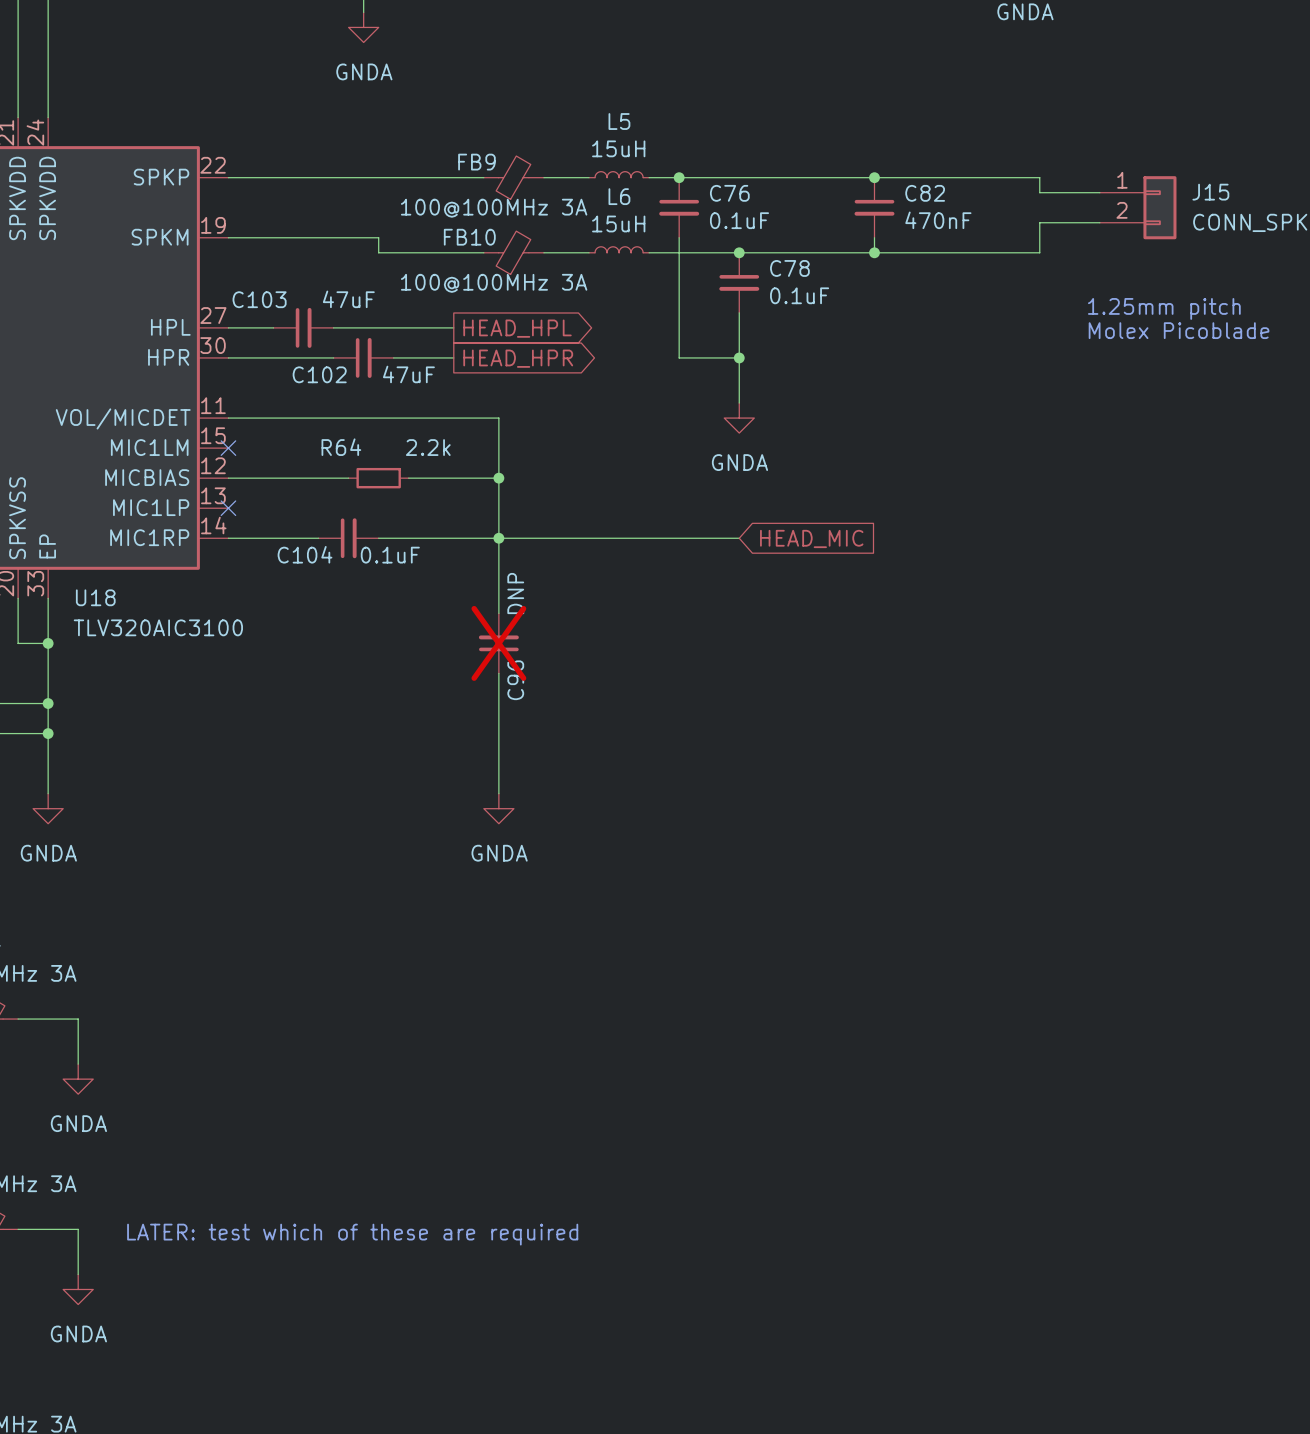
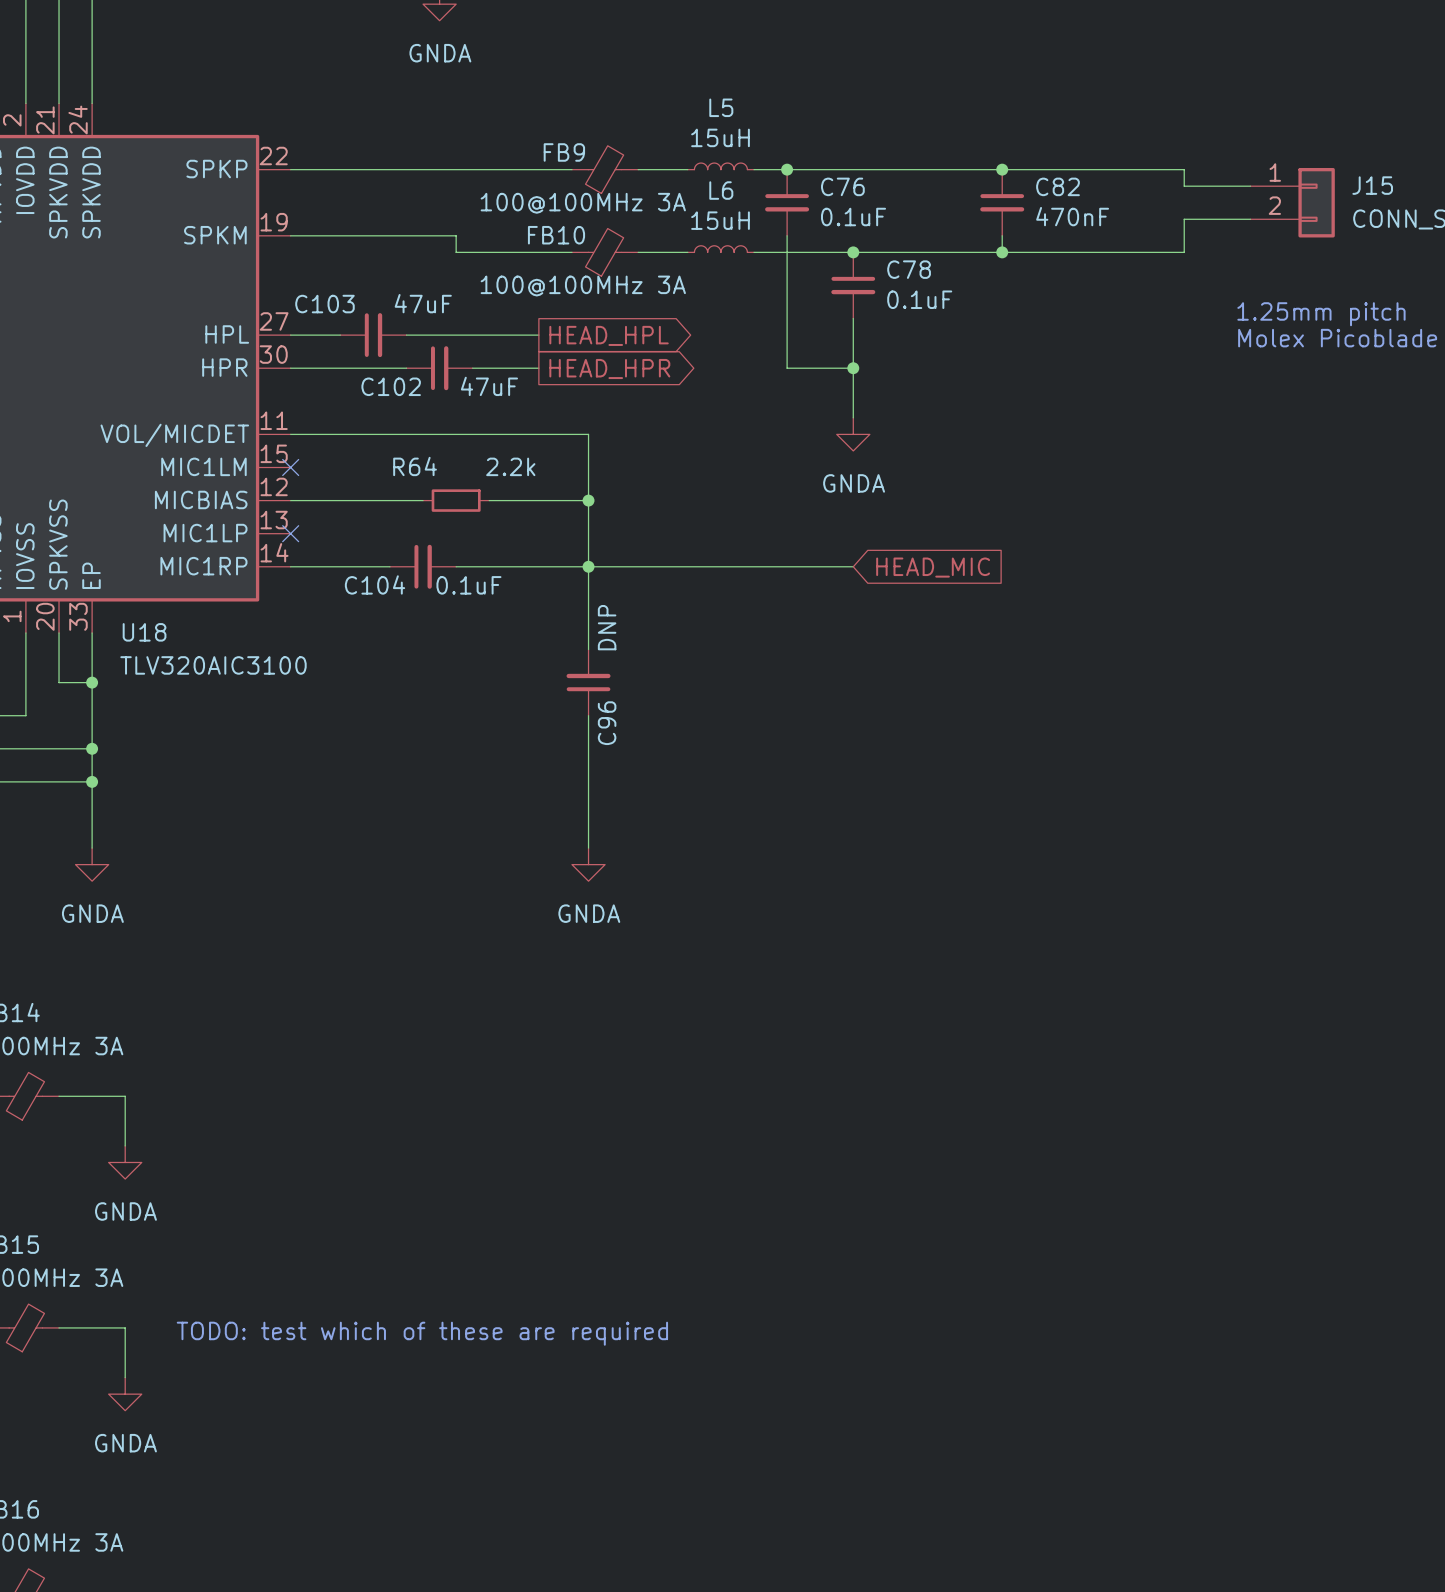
C96 do-not-place cross: (498, 643) -> none
text: LATER: test which of these are required (352, 1234) -> TODO: test which of these are required (422, 1333)

